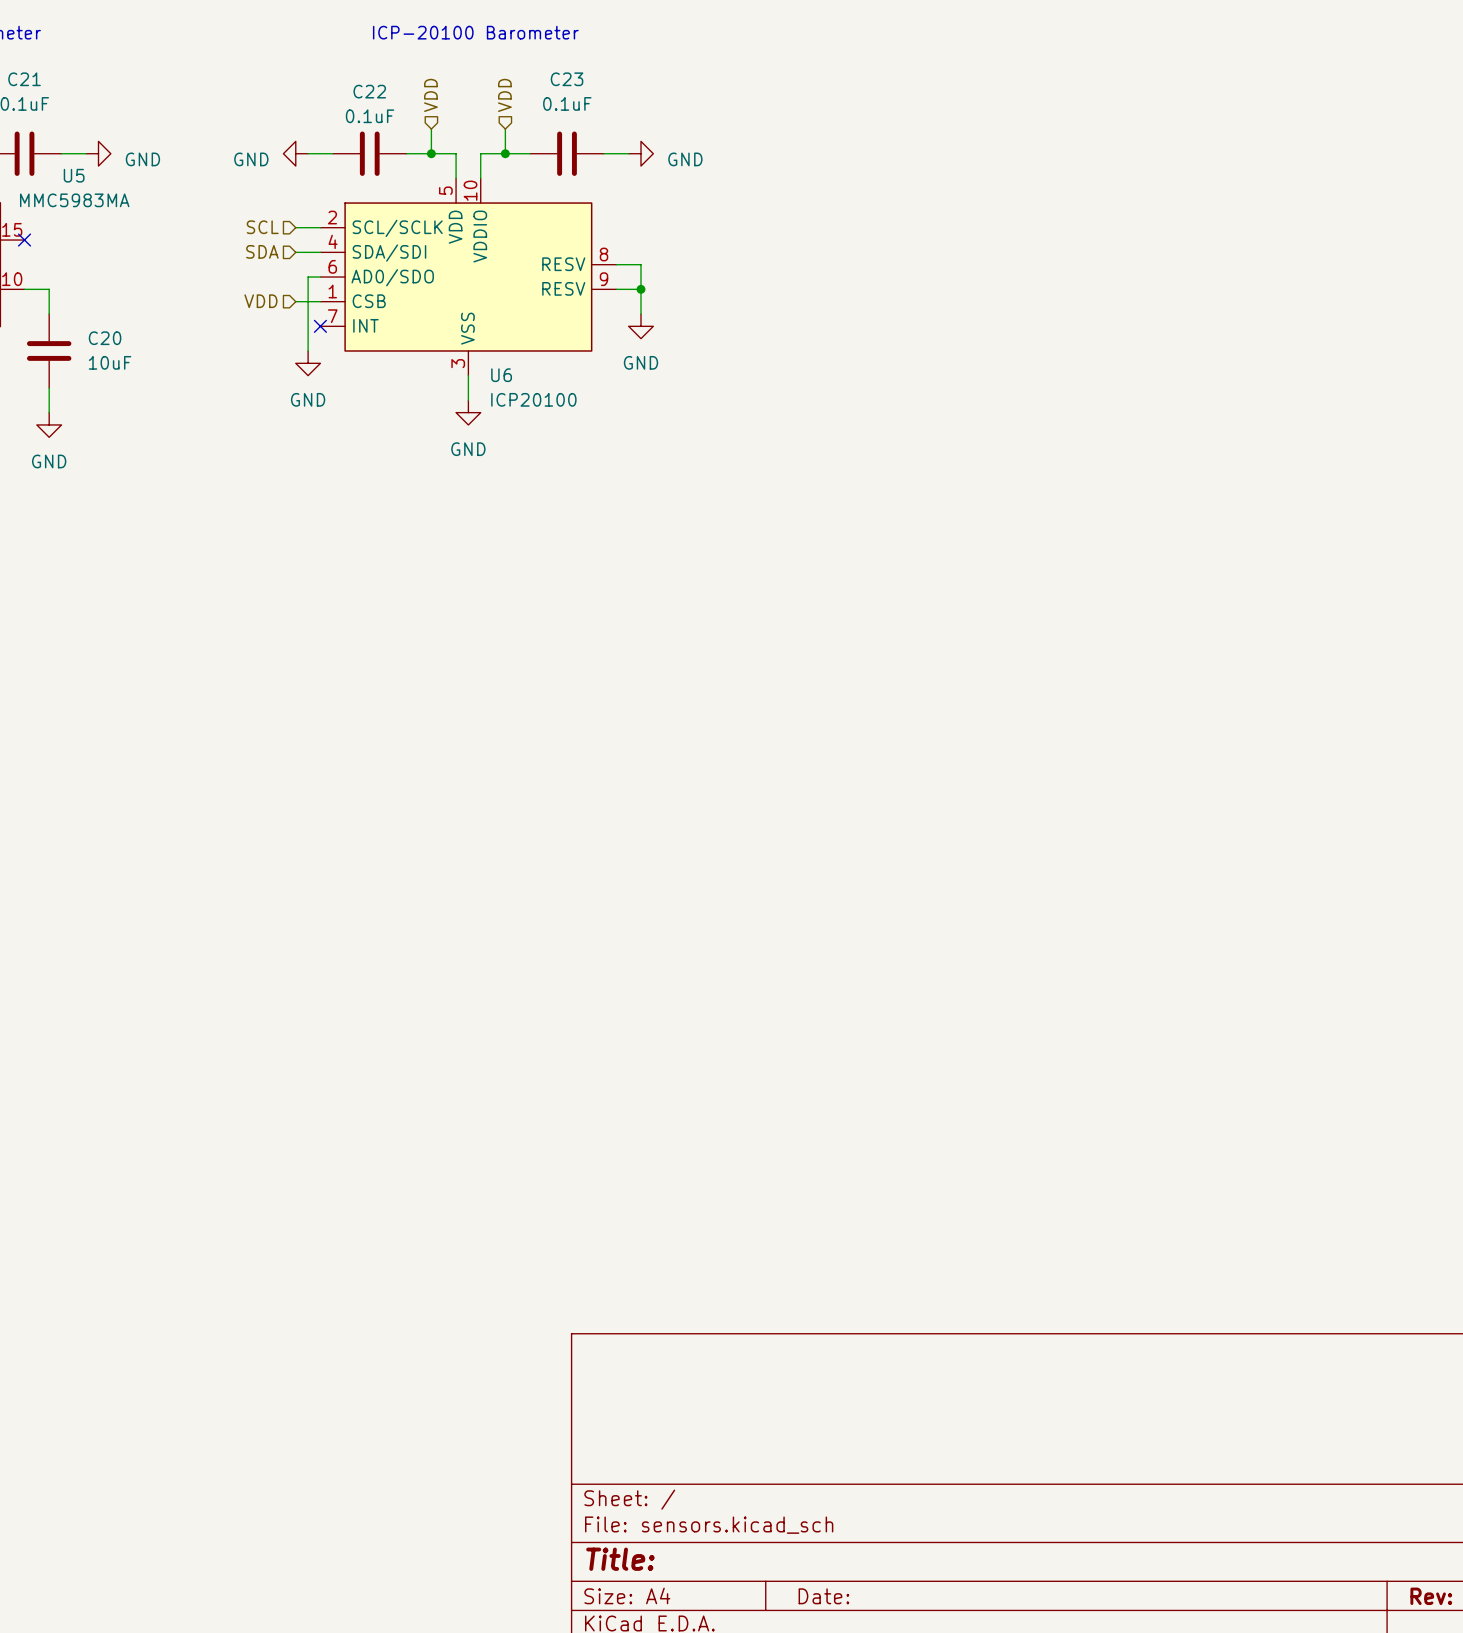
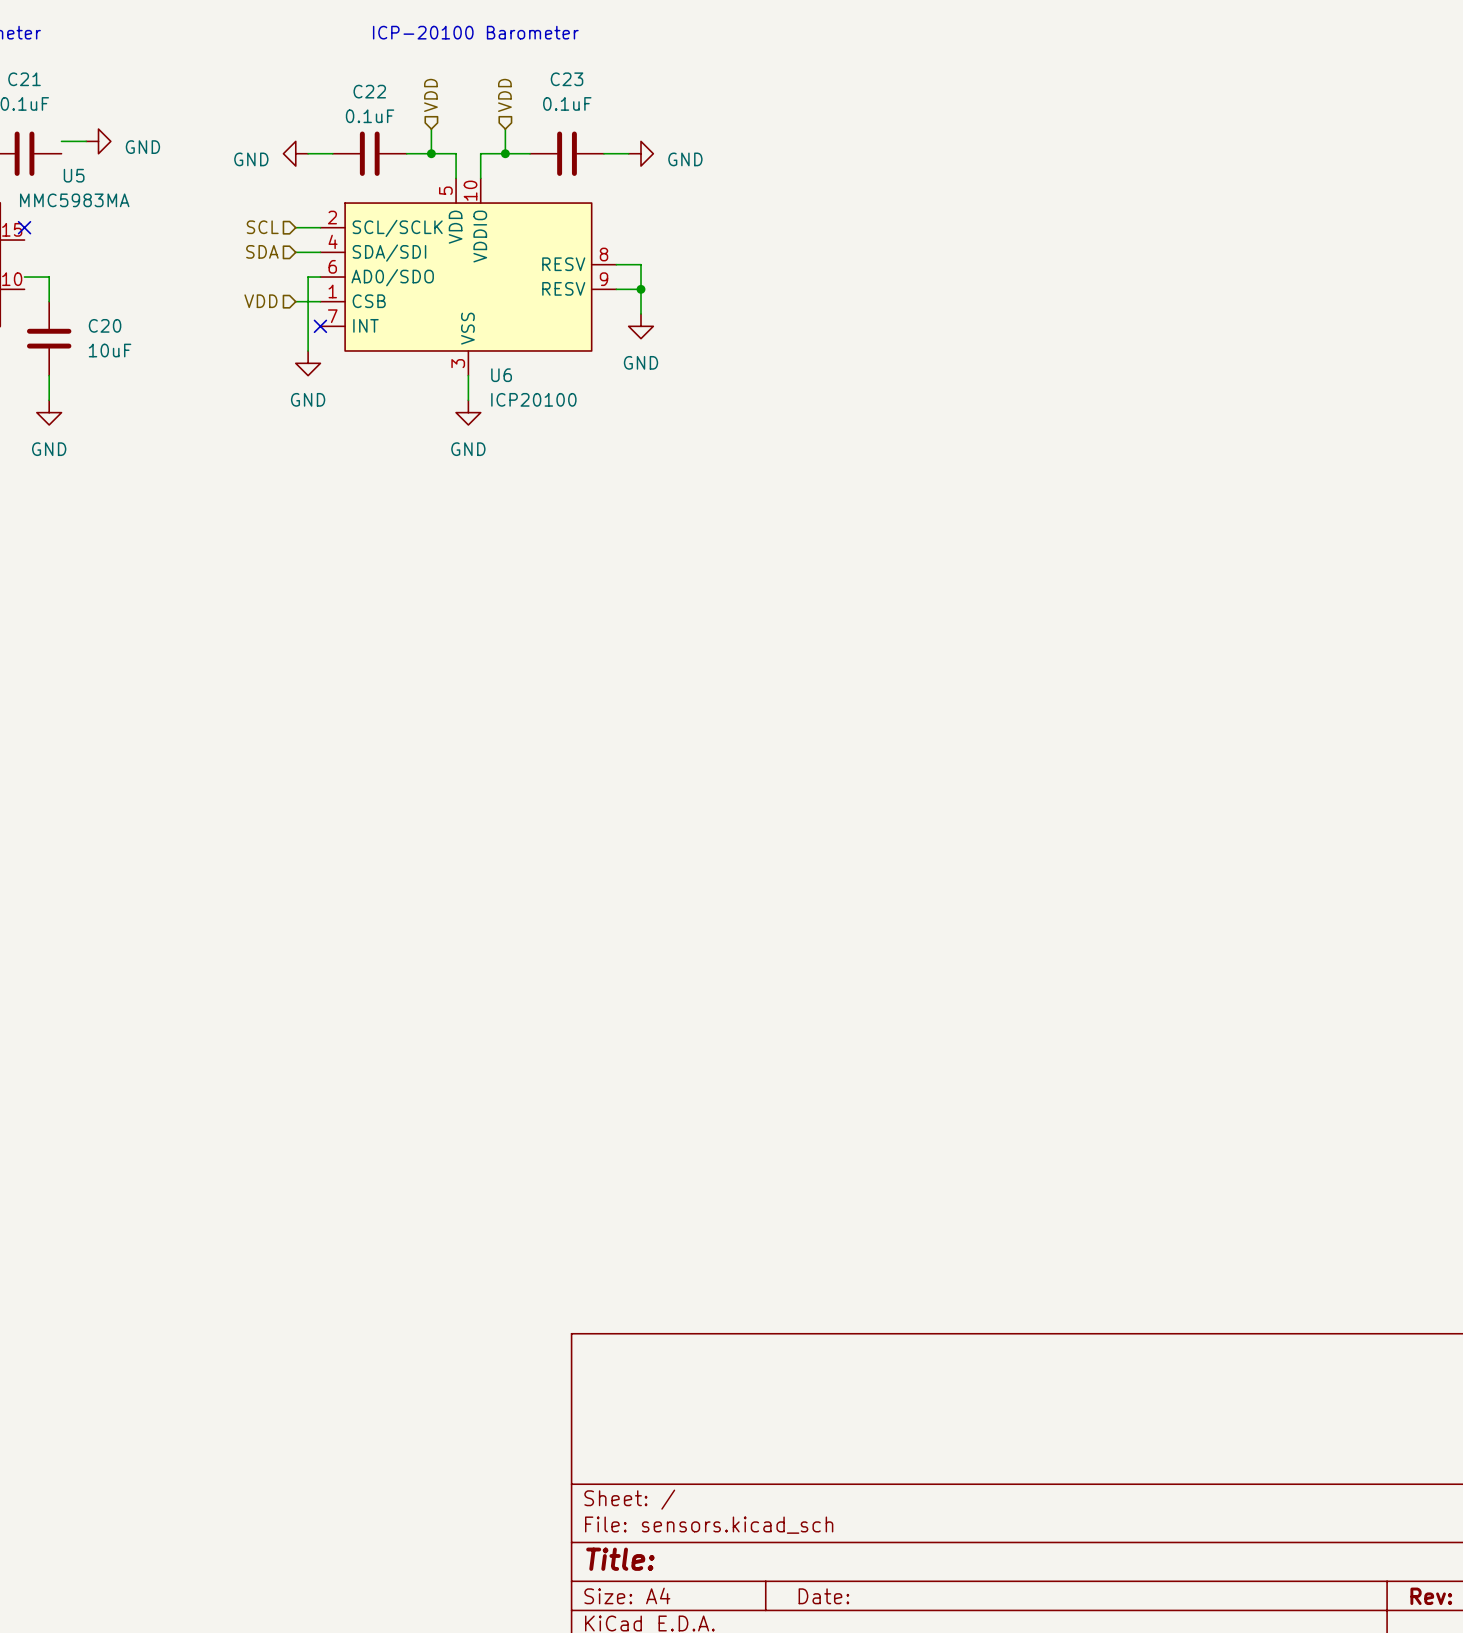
wire: (61, 153) (86, 153) -> (61, 141) (86, 141)
power symbol position: GND (98, 153) -> GND (98, 141)
no-connect mark position: (24, 240) -> (24, 227)
wire: (24, 289) (49, 289) -> (24, 277) (49, 277) (49, 289)
C20 position: (49, 350) -> (49, 338)
power symbol position: GND (49, 424) -> GND (49, 412)

